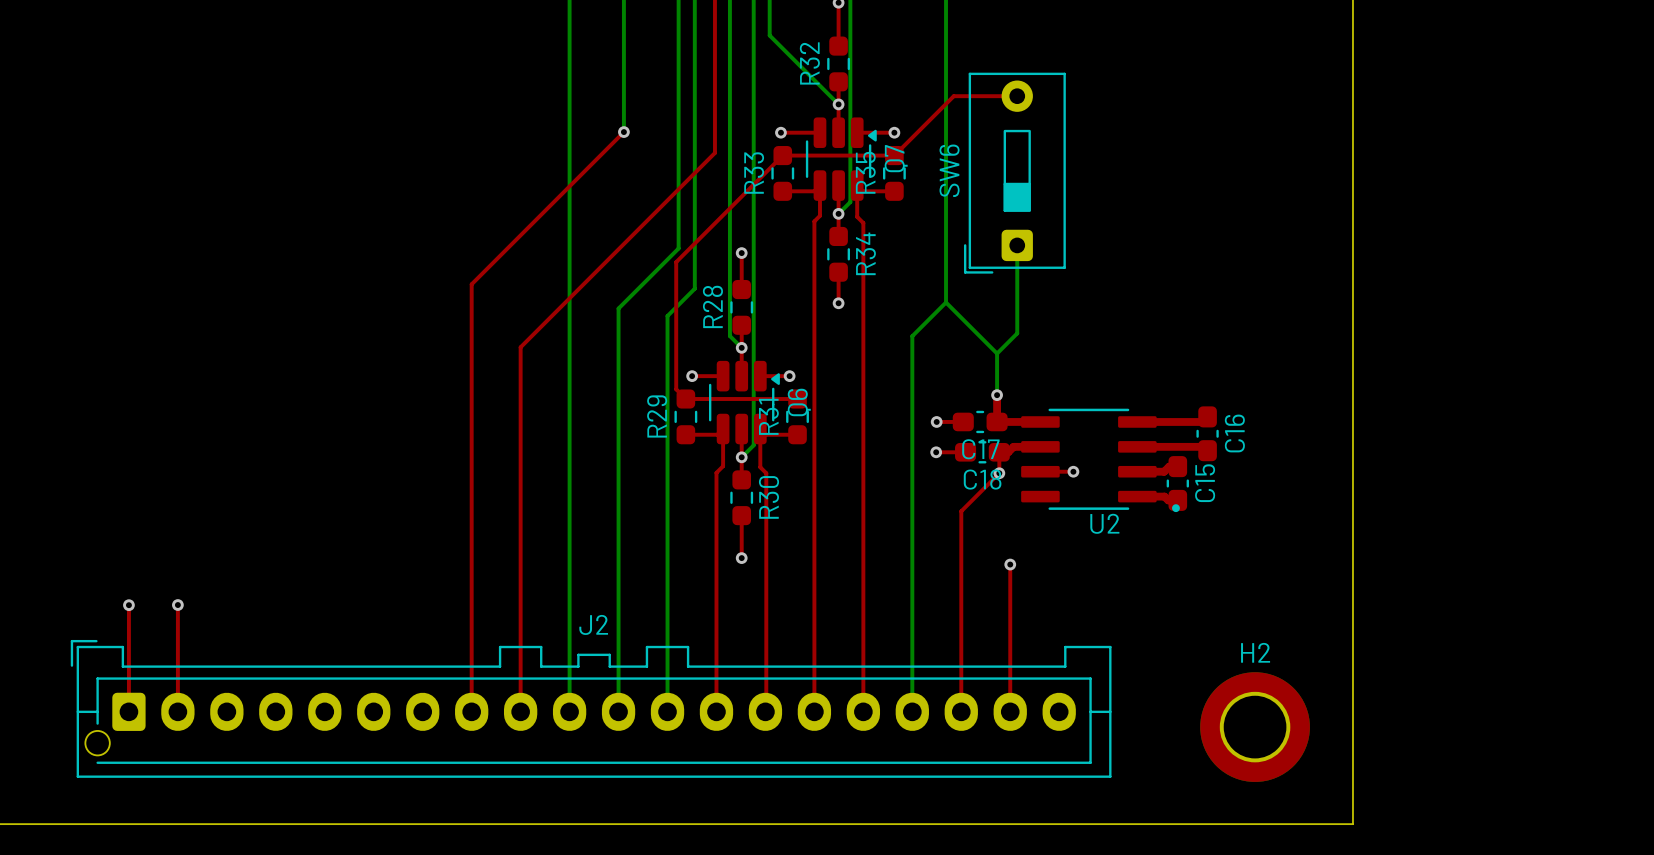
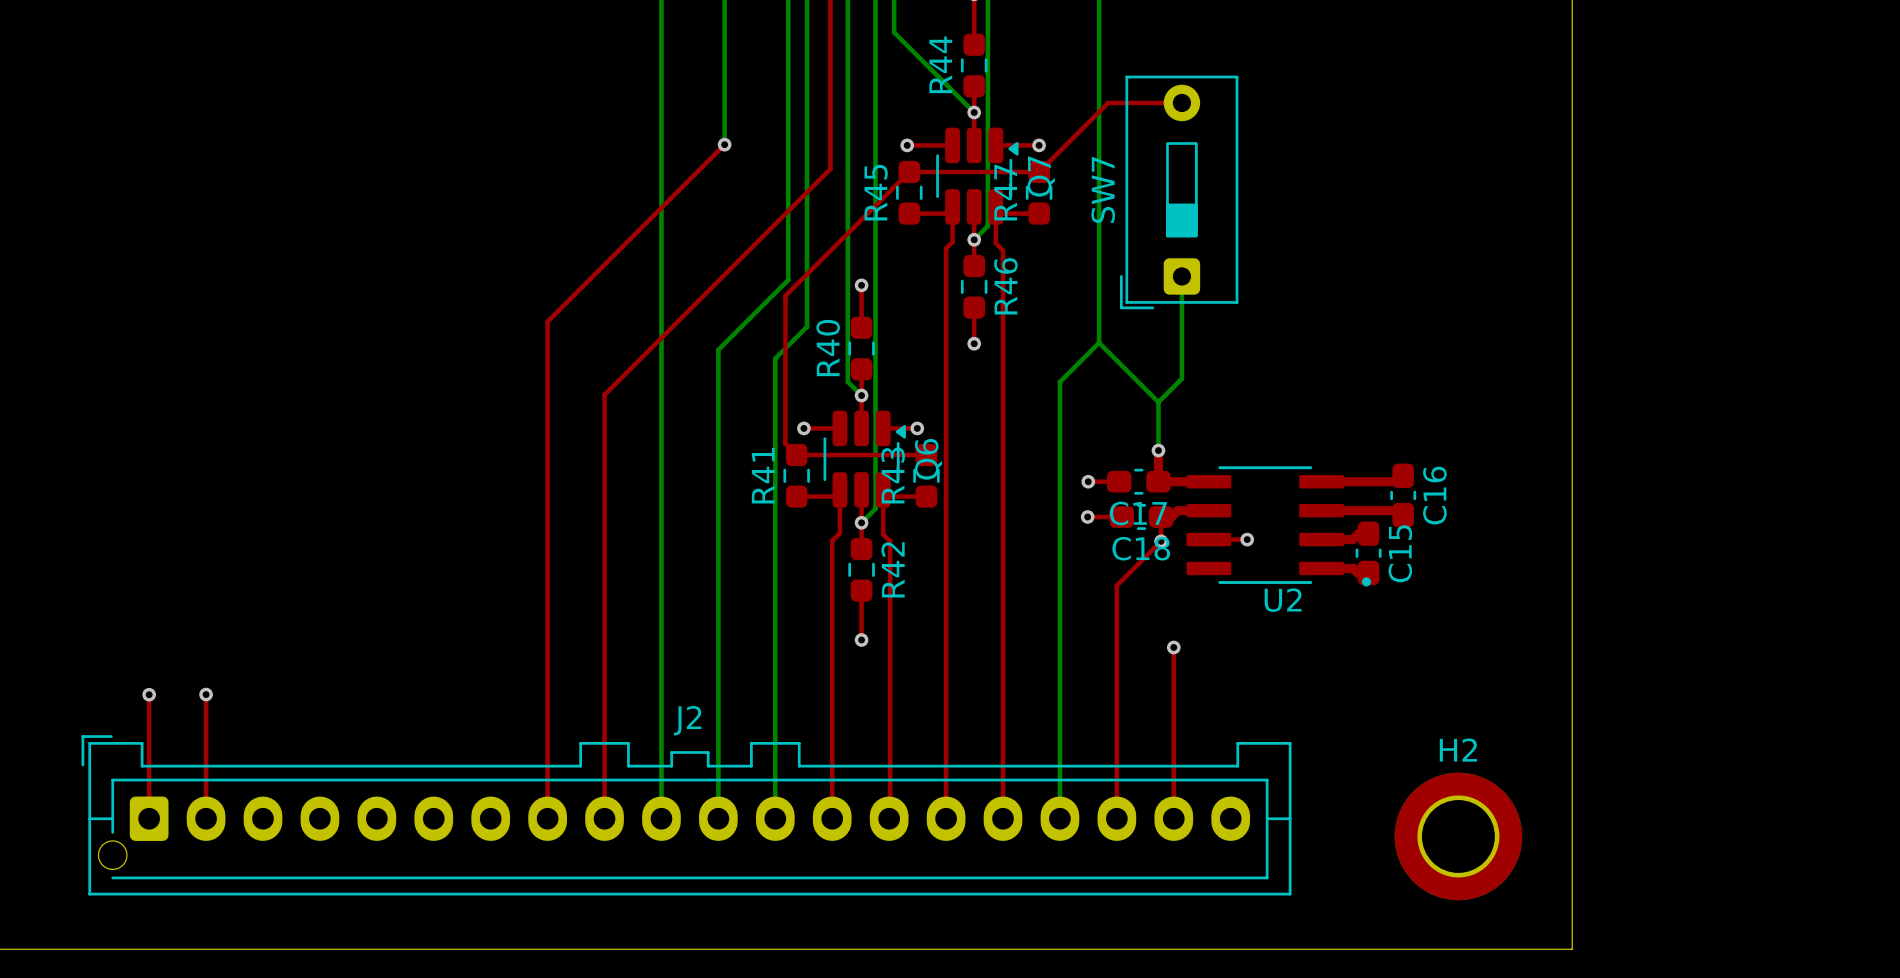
R32 name: R32 (809, 63) -> R44 (940, 64)
SW6 name: SW6 (949, 170) -> SW7 (1103, 190)
R35 name: R35 (865, 172) -> R47 (1005, 192)
R33 name: R33 (754, 173) -> R45 (876, 192)
R34 name: R34 (865, 253) -> R46 (1005, 286)
R28 name: R28 (712, 306) -> R40 (828, 348)
R29 name: R29 (657, 416) -> R41 (763, 475)
R31 name: R31 (768, 416) -> R43 (893, 475)
R30 name: R30 (768, 497) -> R42 (893, 569)

